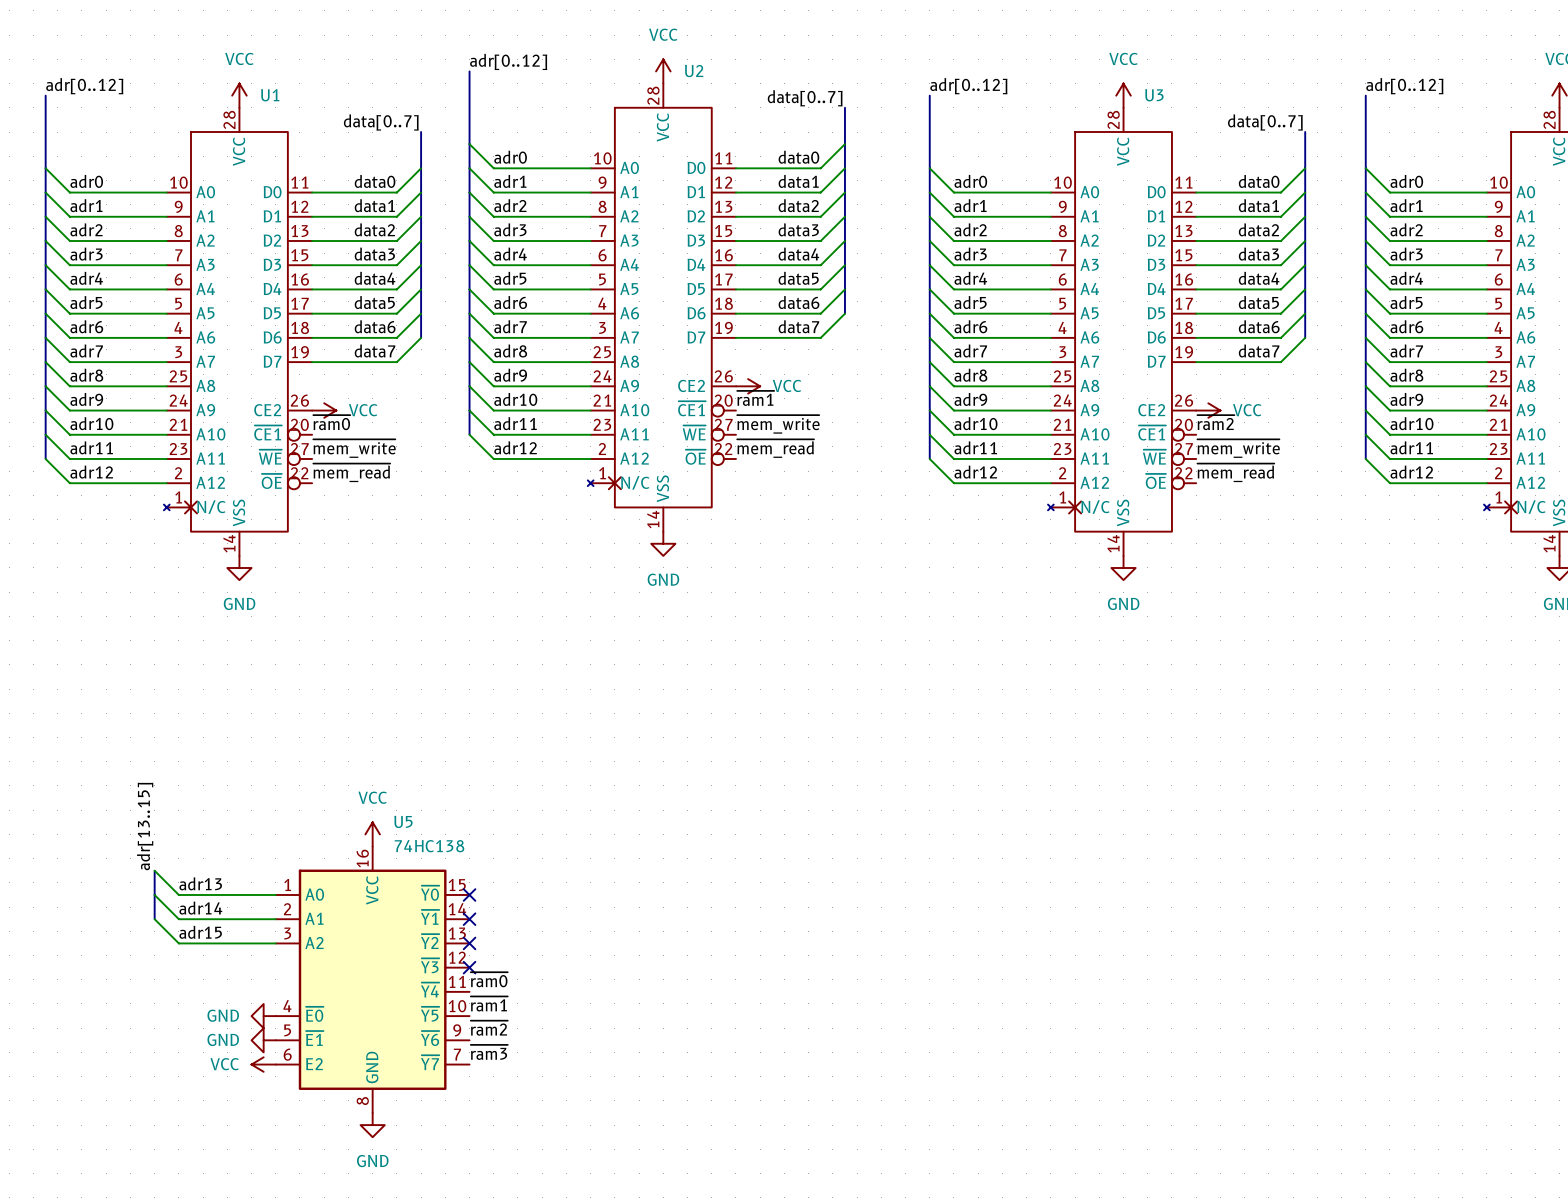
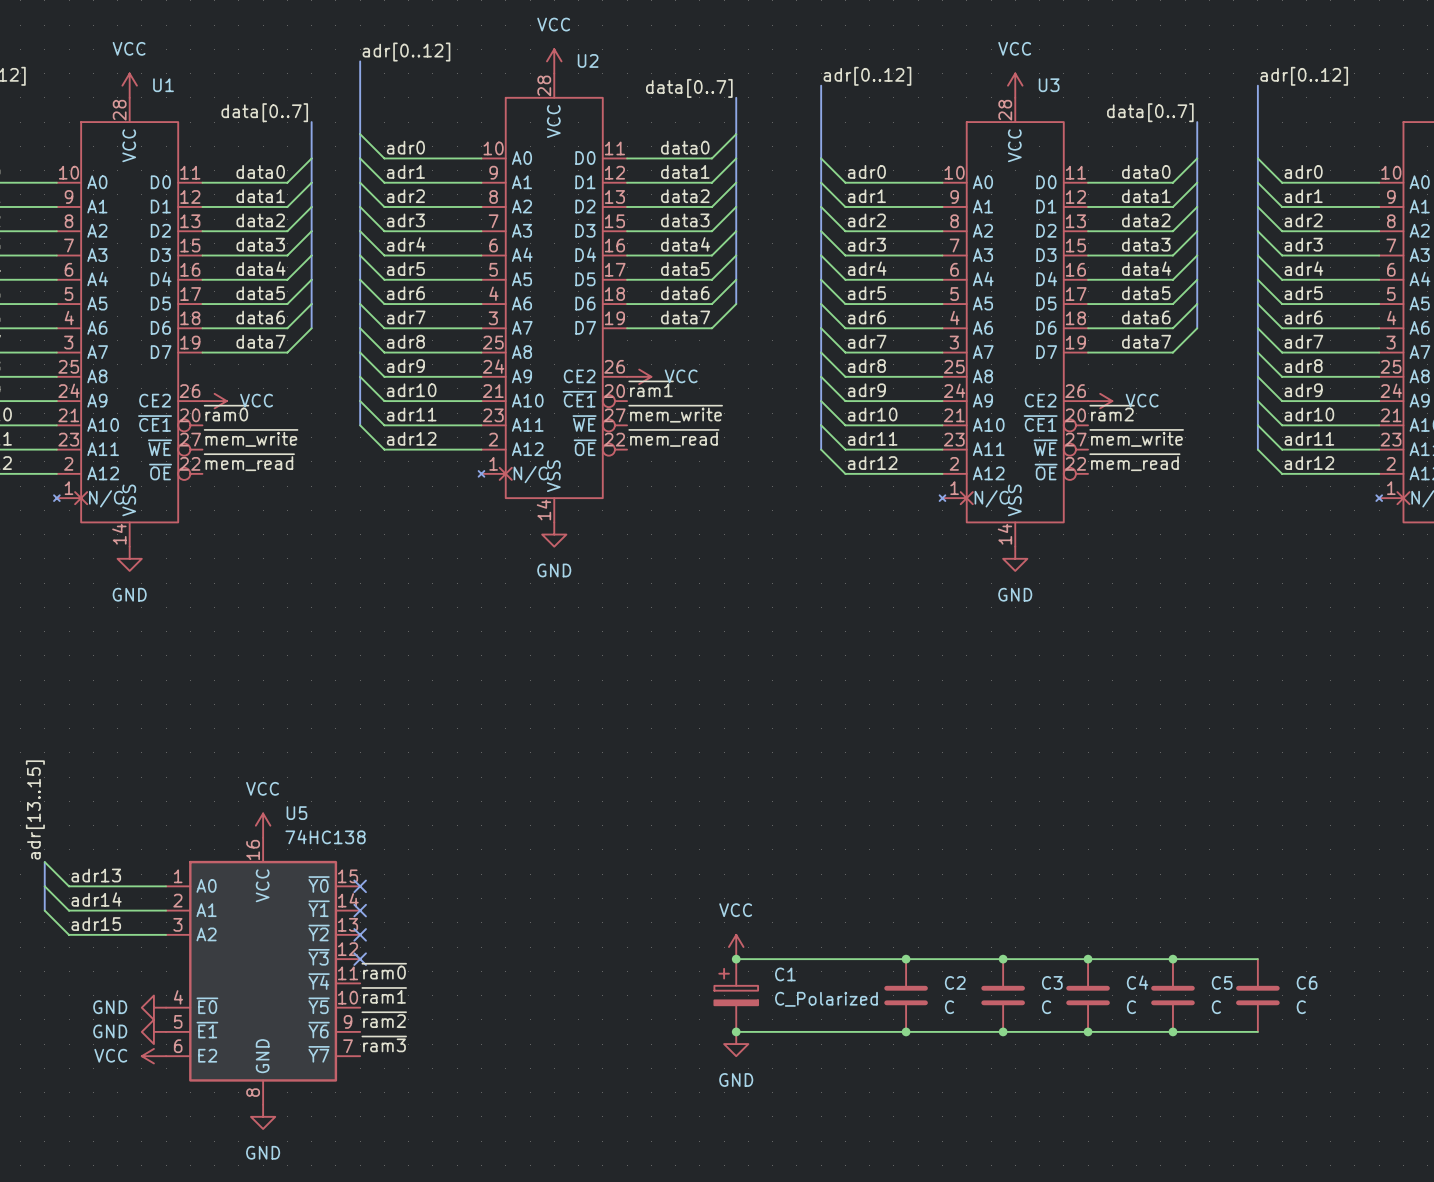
power symbol: none -> VCC (736, 947)
wire: none -> (736, 959) (1257, 959)
junction: none -> (736, 959)
junction: none -> (906, 959)
junction: none -> (1003, 959)
junction: none -> (1088, 959)
junction: none -> (1172, 959)
C1: none -> C_Polarized (736, 995)
C2: none -> C (906, 995)
C3: none -> C (1003, 995)
C4: none -> C (1088, 995)
C5: none -> C (1172, 995)
C6: none -> C (1257, 995)
wire: none -> (736, 1031) (1257, 1031)
junction: none -> (736, 1031)
junction: none -> (906, 1031)
junction: none -> (1003, 1031)
junction: none -> (1088, 1031)
junction: none -> (1172, 1031)
power symbol: none -> GND (736, 1044)

